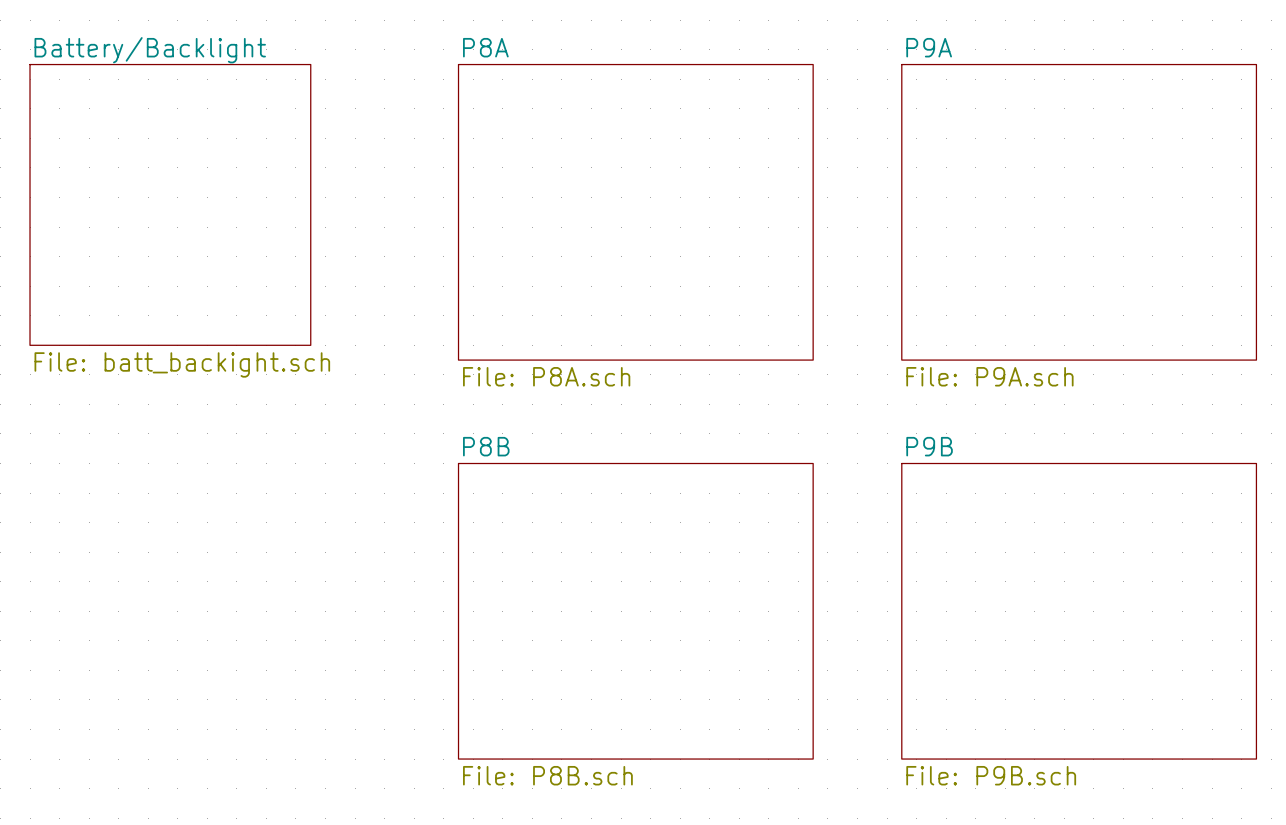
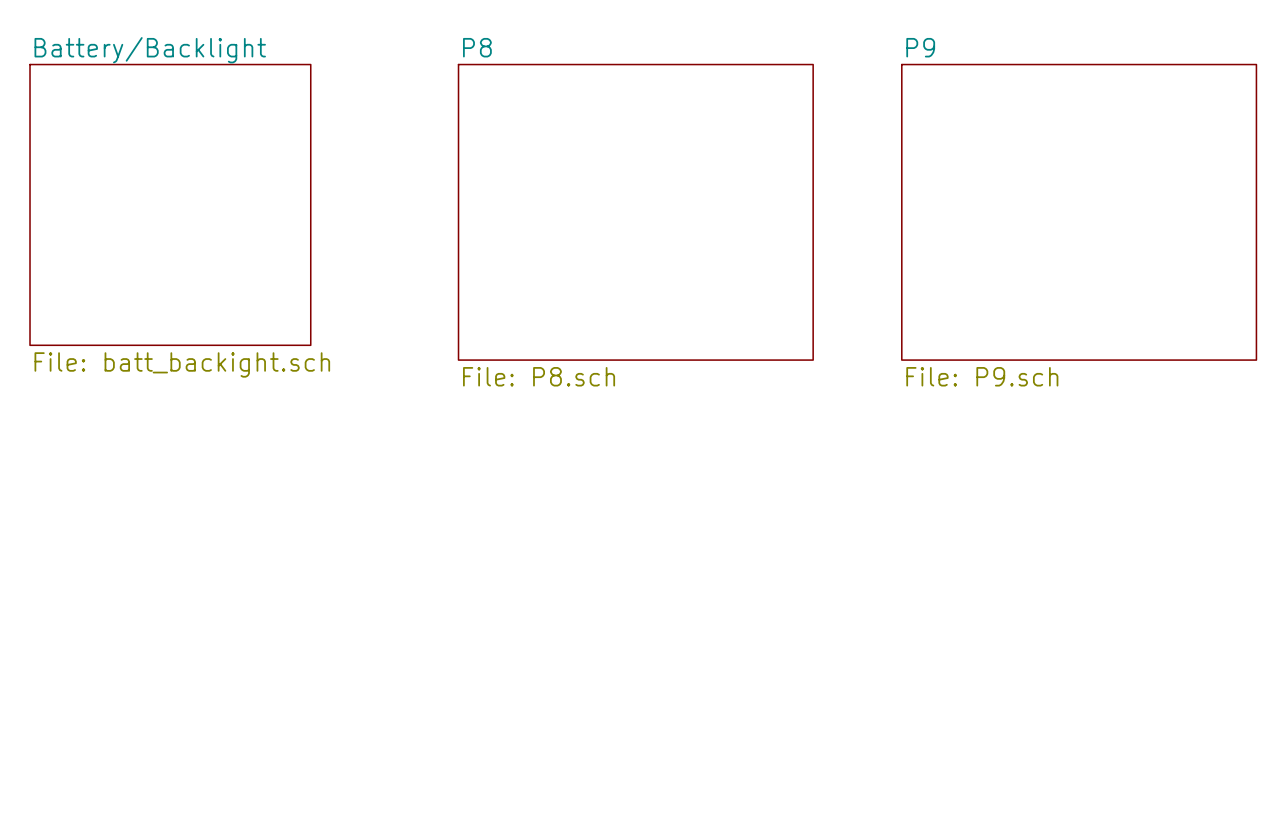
sheet P8A name: P8A (485, 47) -> P8 (477, 47)
sheet P9A name: P9A (929, 47) -> P9 (920, 47)
sheet P8A value: File: P8A.sch (546, 376) -> File: P8.sch (539, 376)
sheet P9A value: File: P9A.sch (989, 376) -> File: P9.sch (982, 376)
sheet P8B: File: P8B.sch (635, 611) -> none
sheet P9B: File: P9B.sch (1079, 611) -> none

